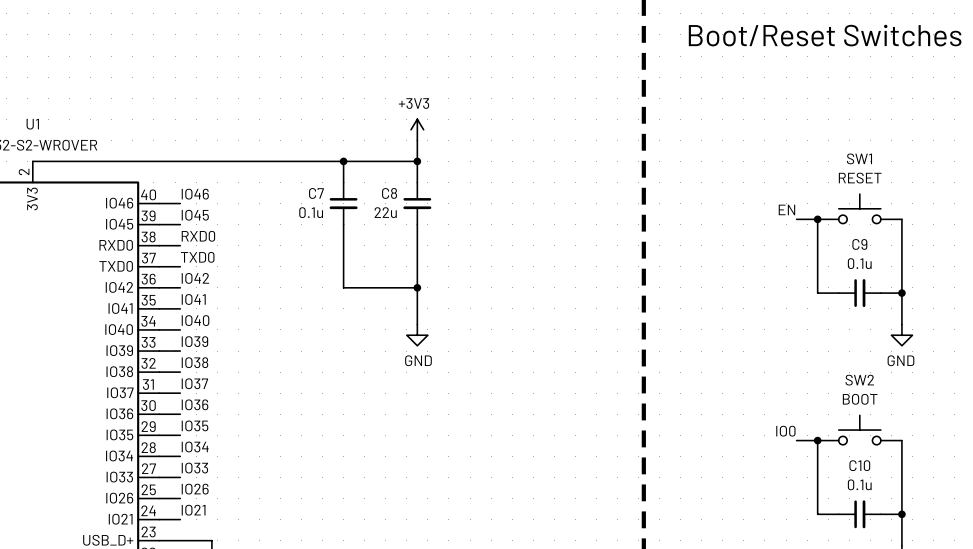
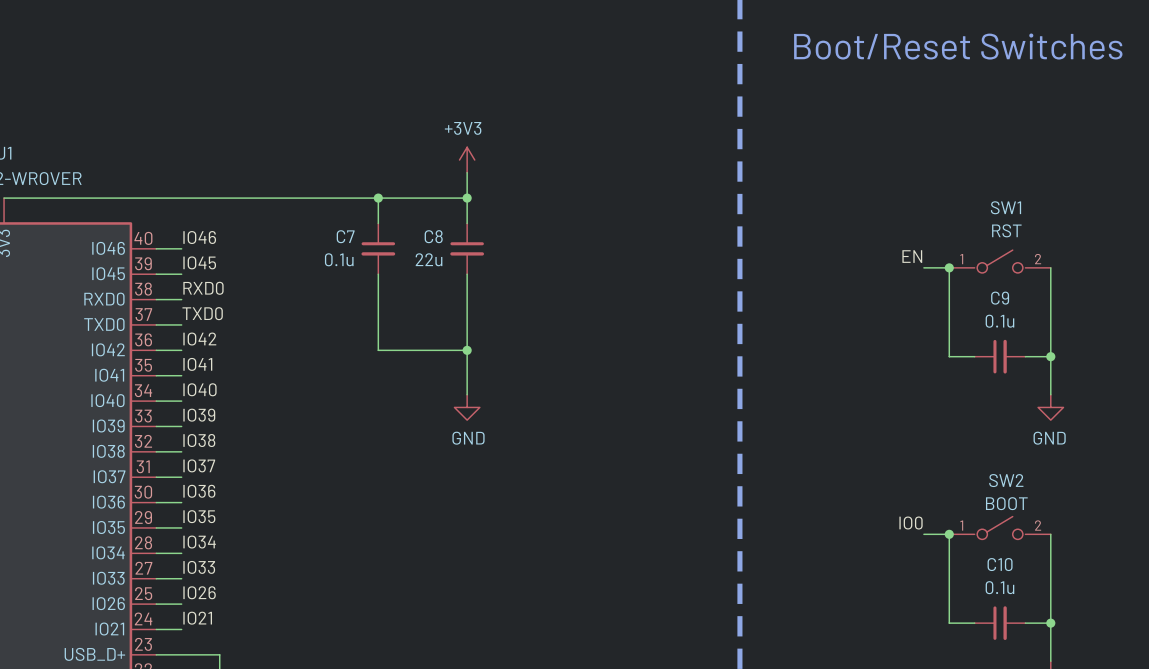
SW1 value: RESET (860, 178) -> RST (1006, 230)
SW1 symbol: [817, 194, 902, 224] -> [949, 250, 1051, 273]
SW2 symbol: [817, 415, 902, 445] -> [949, 516, 1051, 540]

